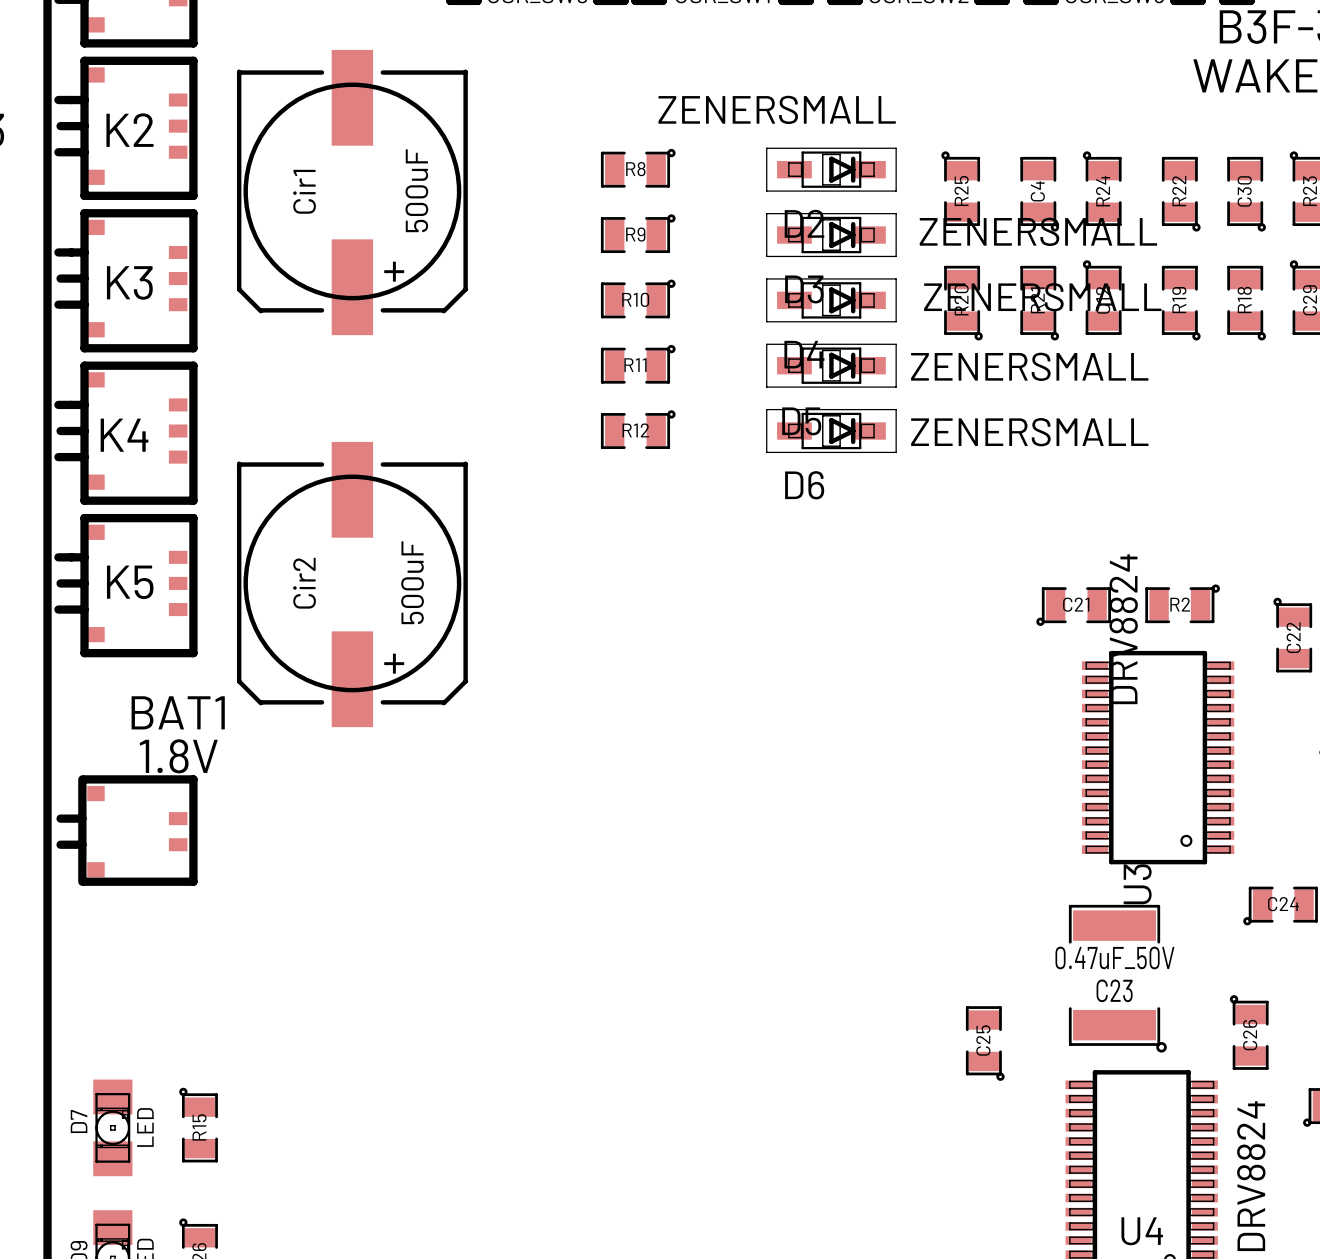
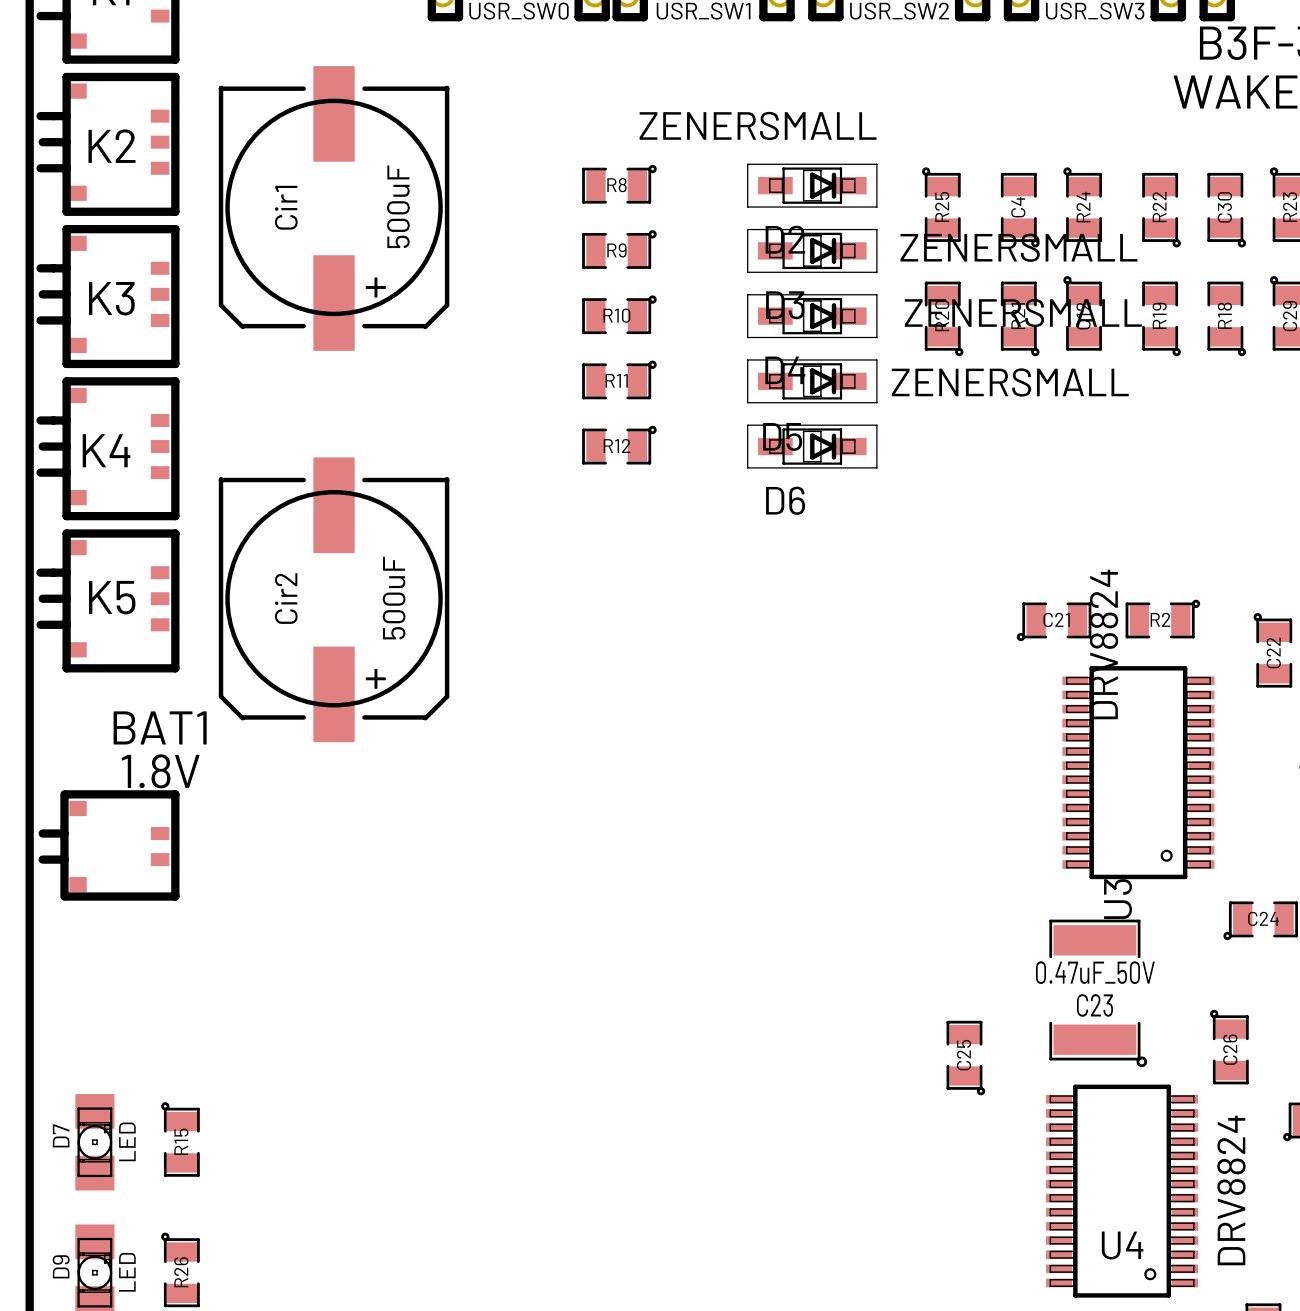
D6 value: ZENERSMALL (1029, 432) -> none

